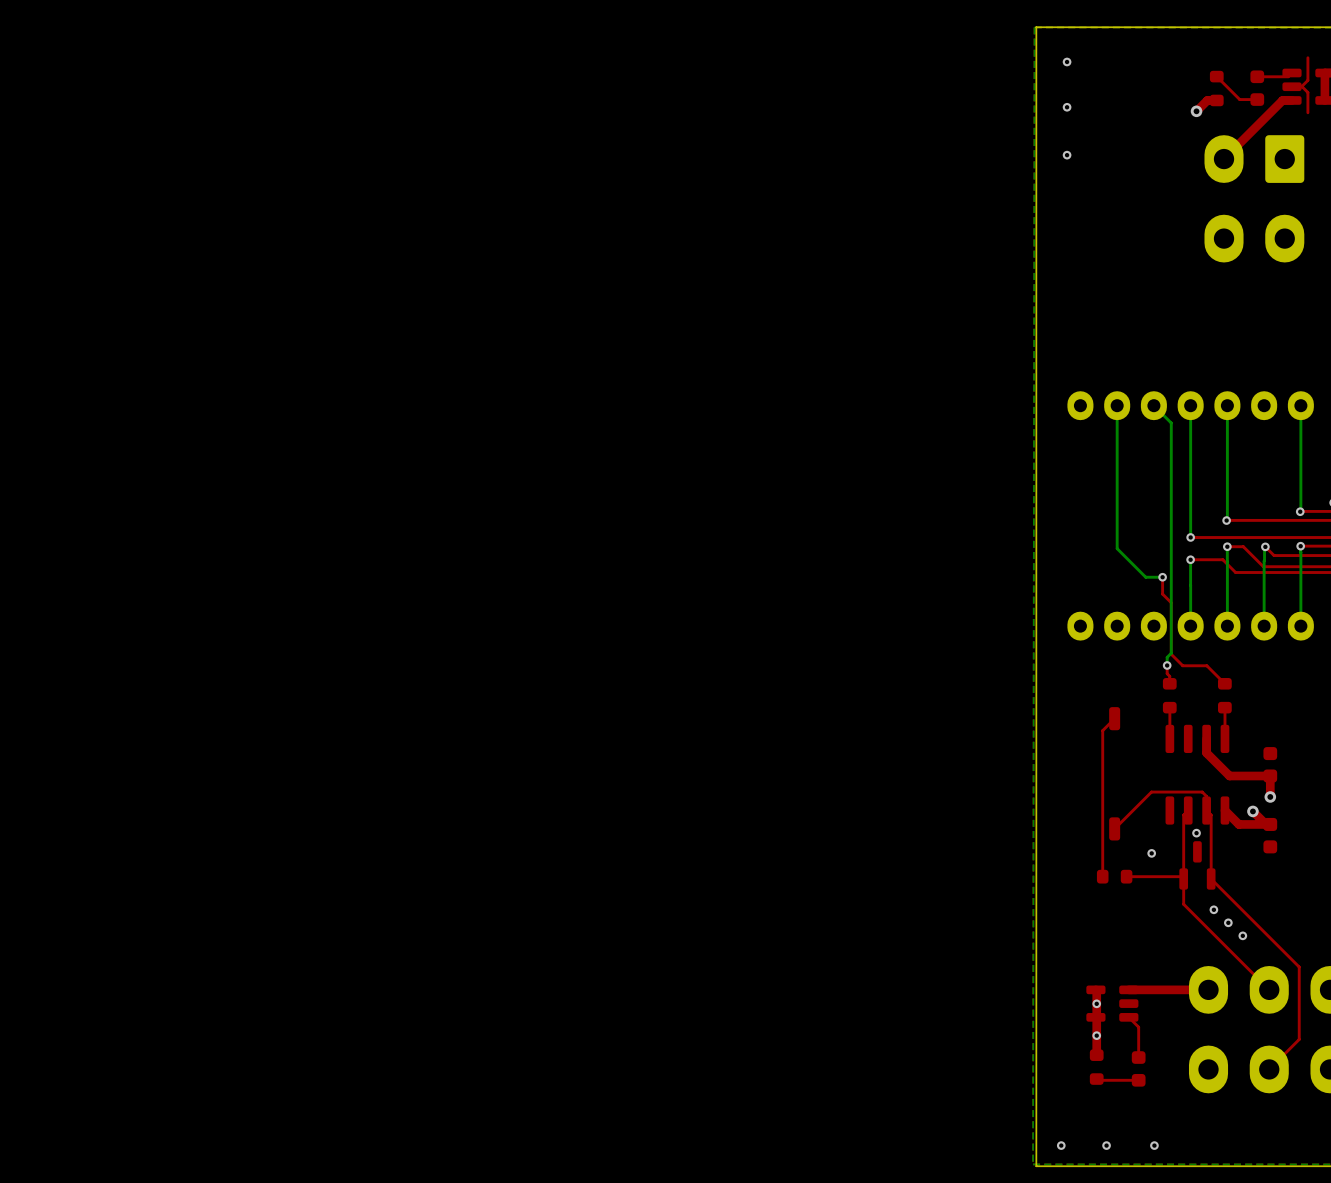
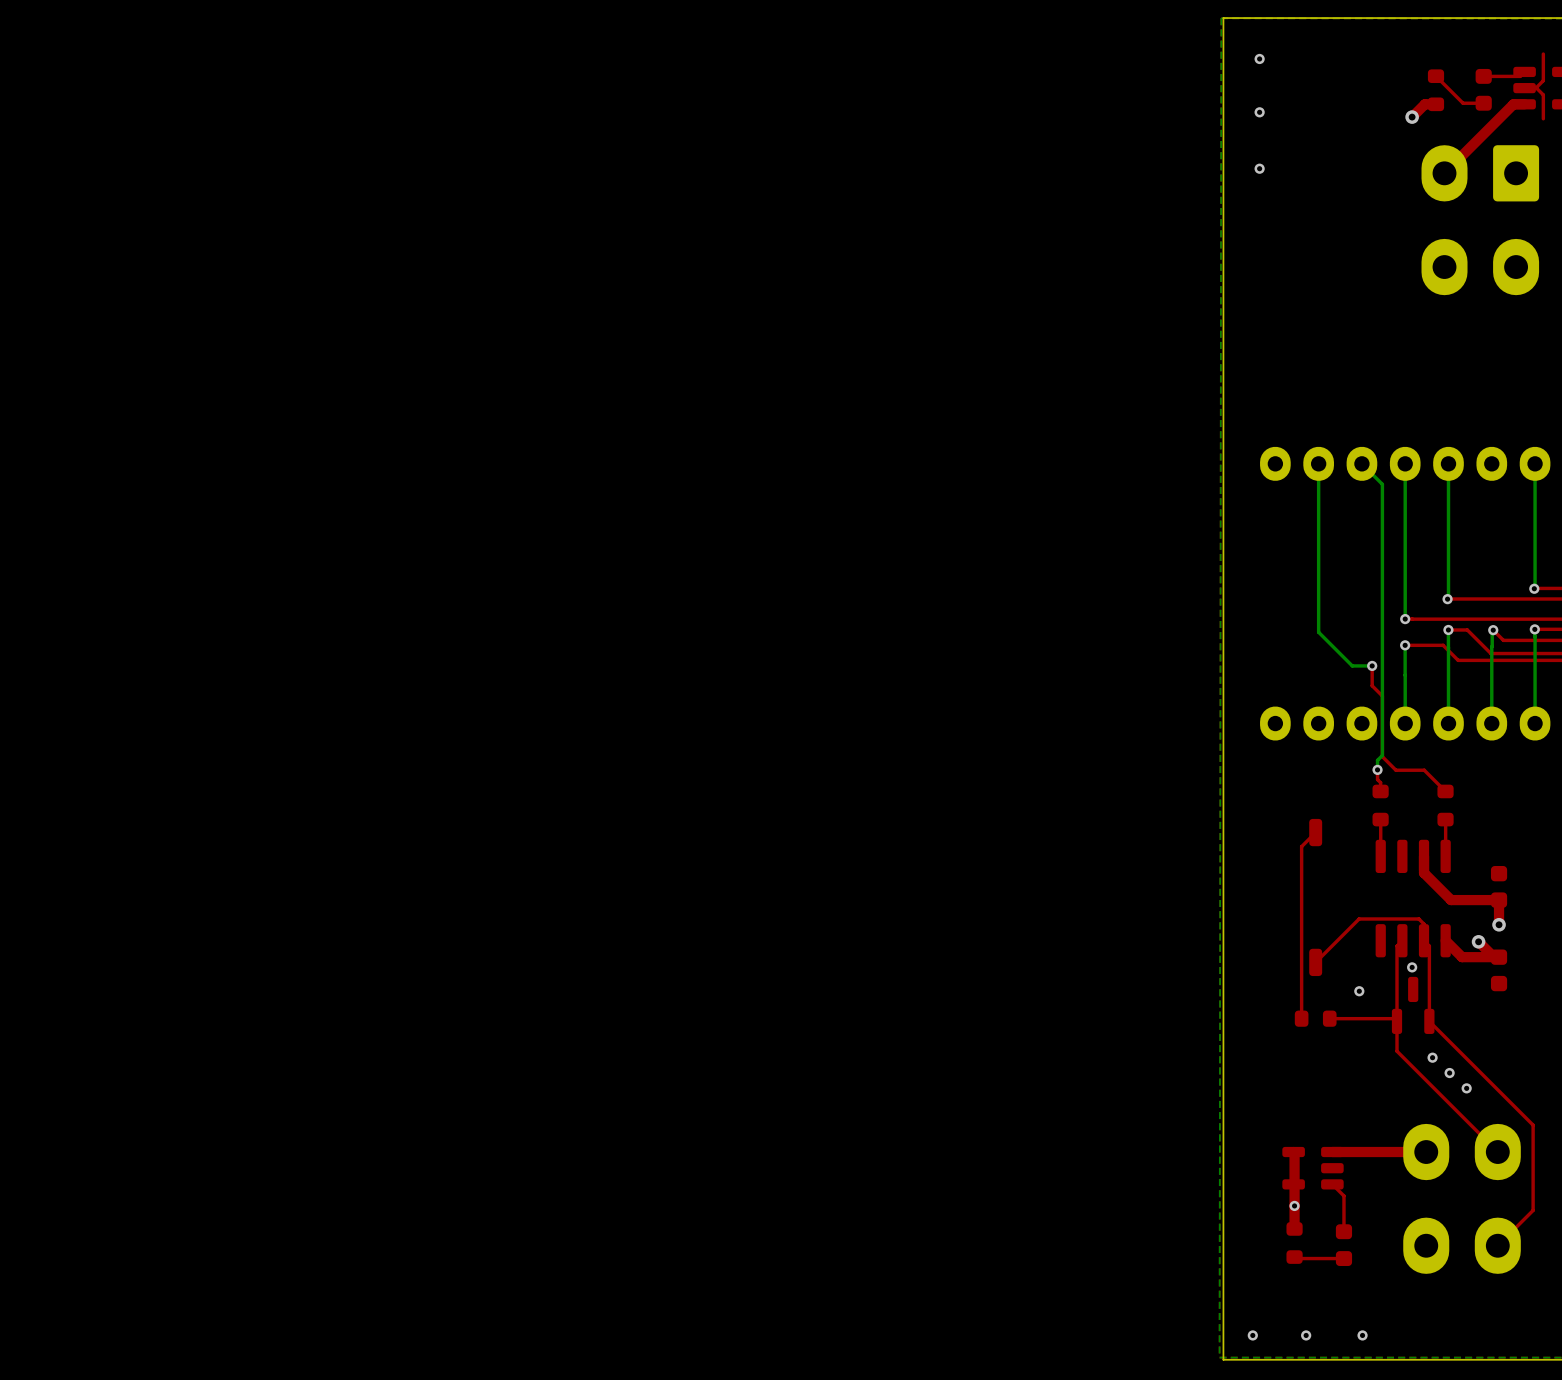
via: (1096, 1003) -> none

